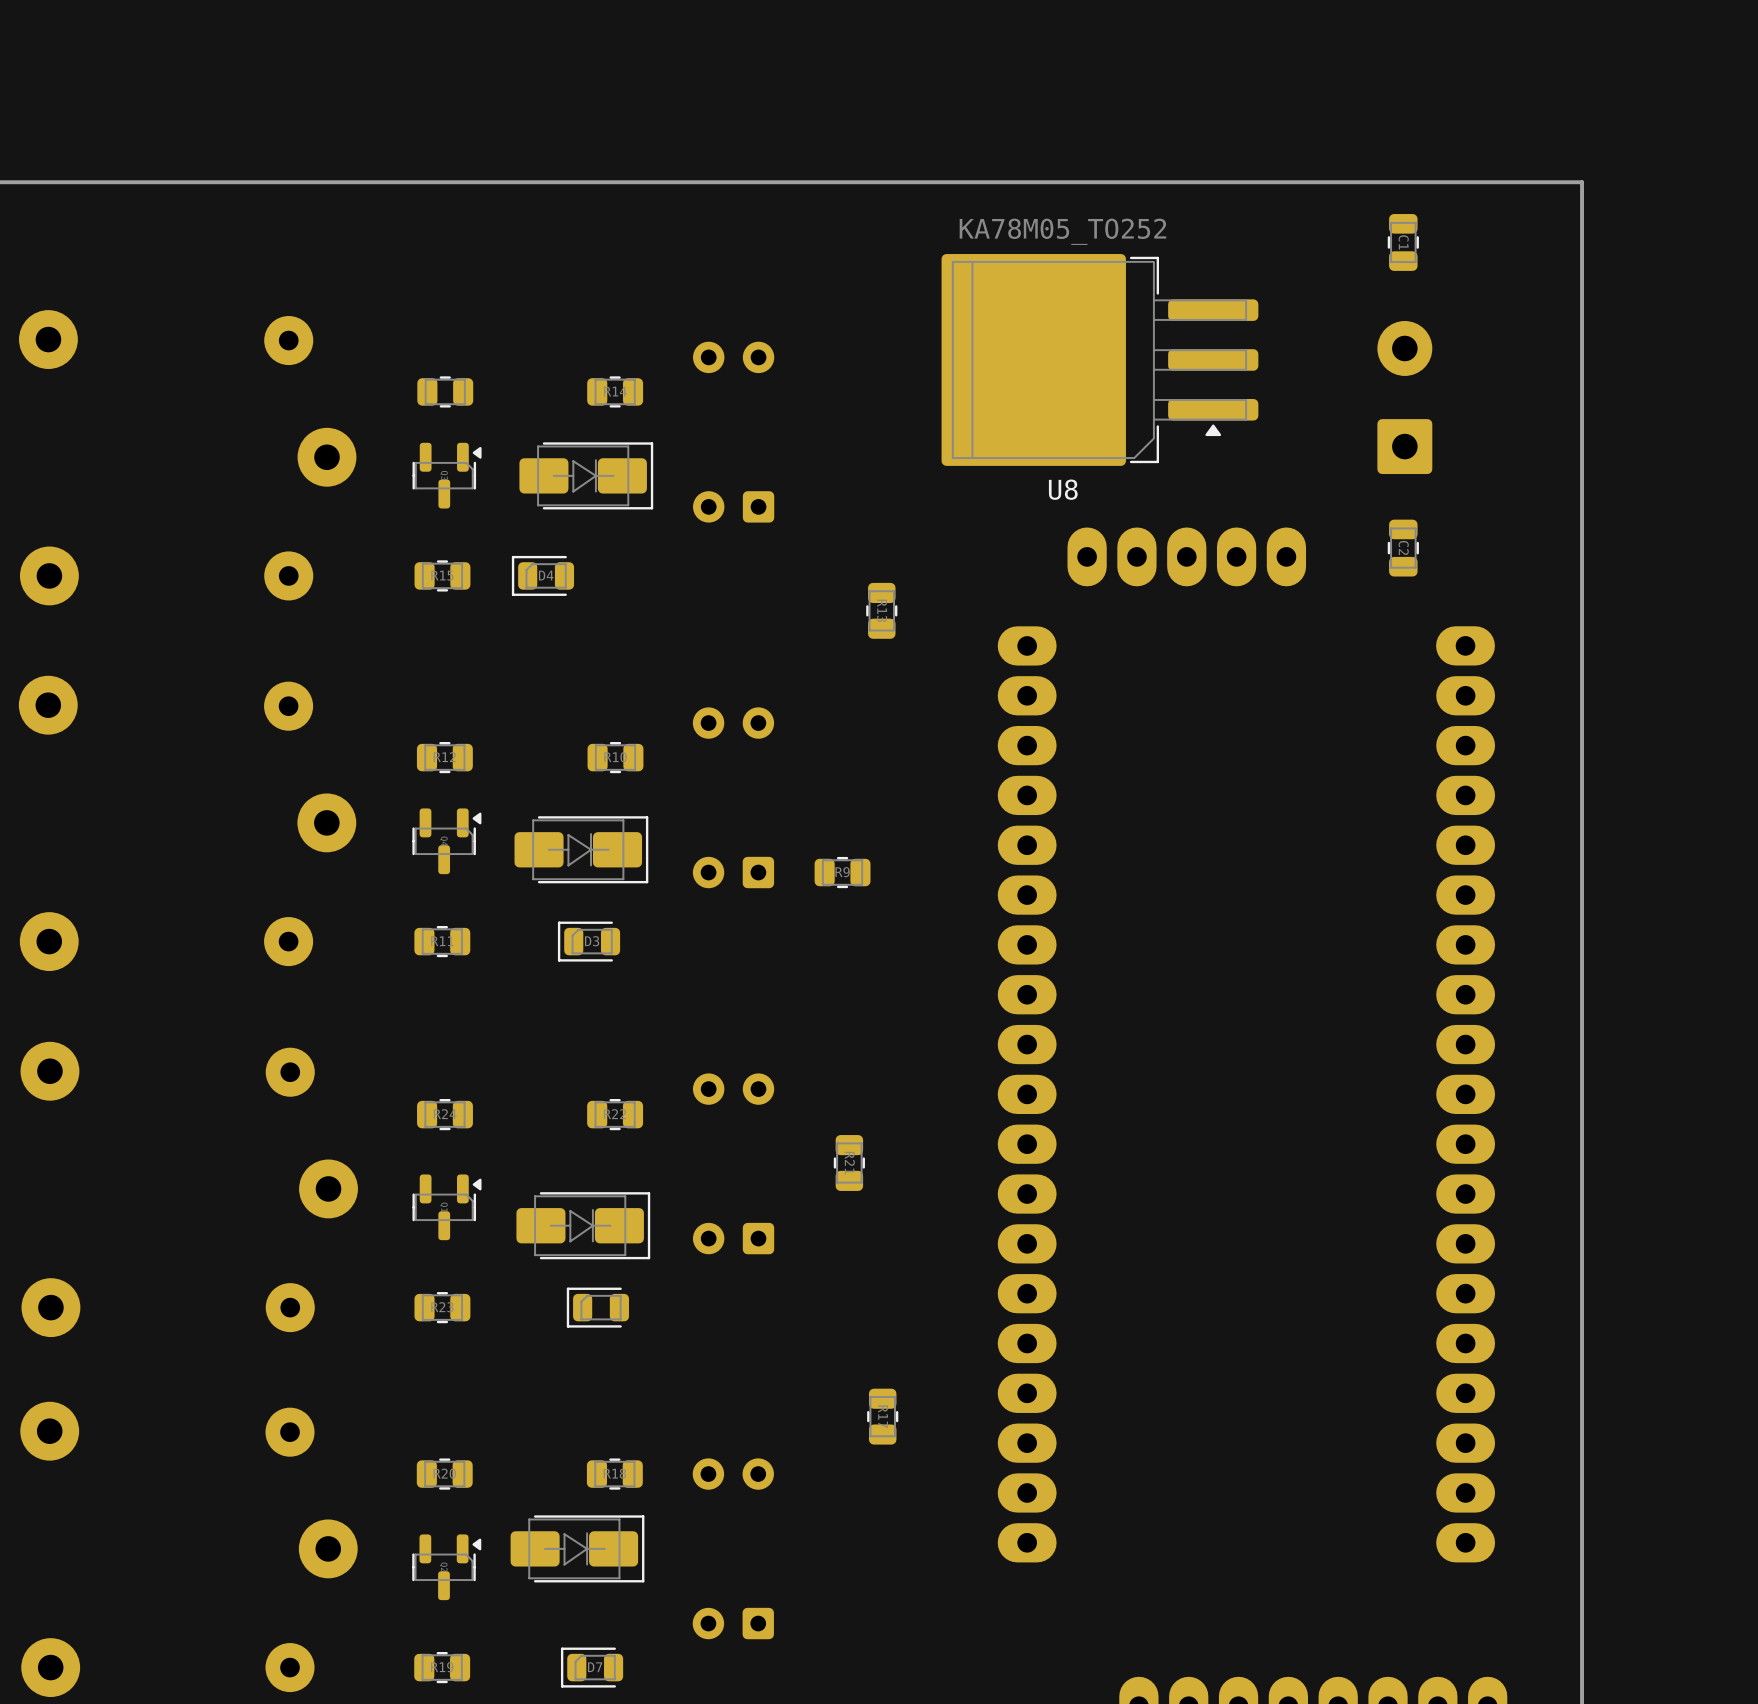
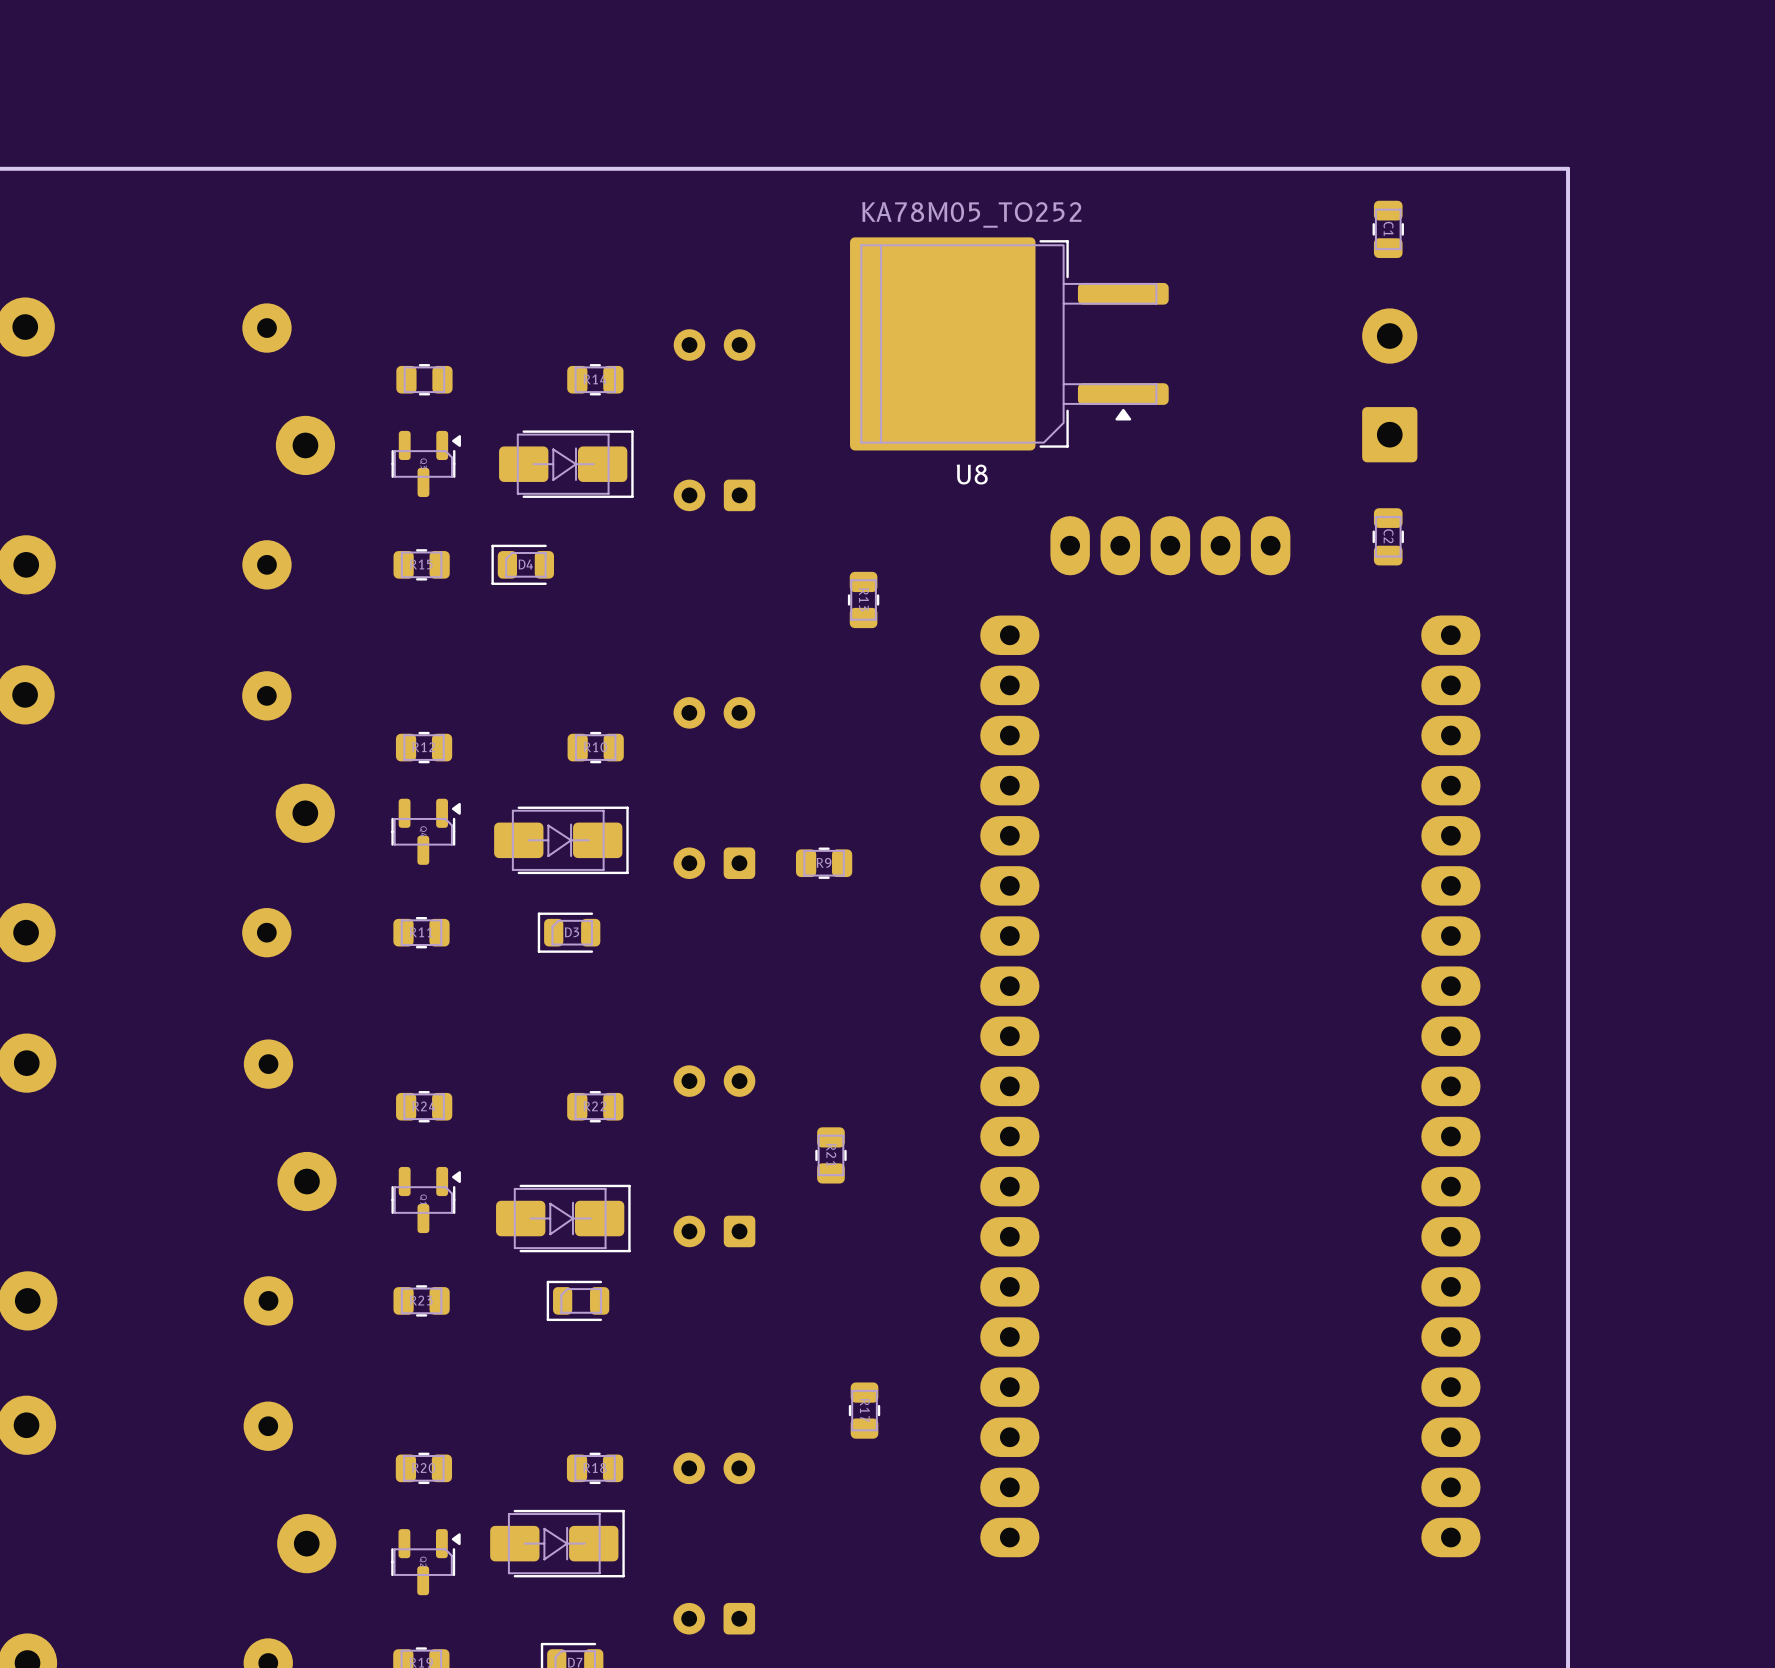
U8 footprint: [941, 254, 1259, 466] -> [850, 237, 1169, 451]

